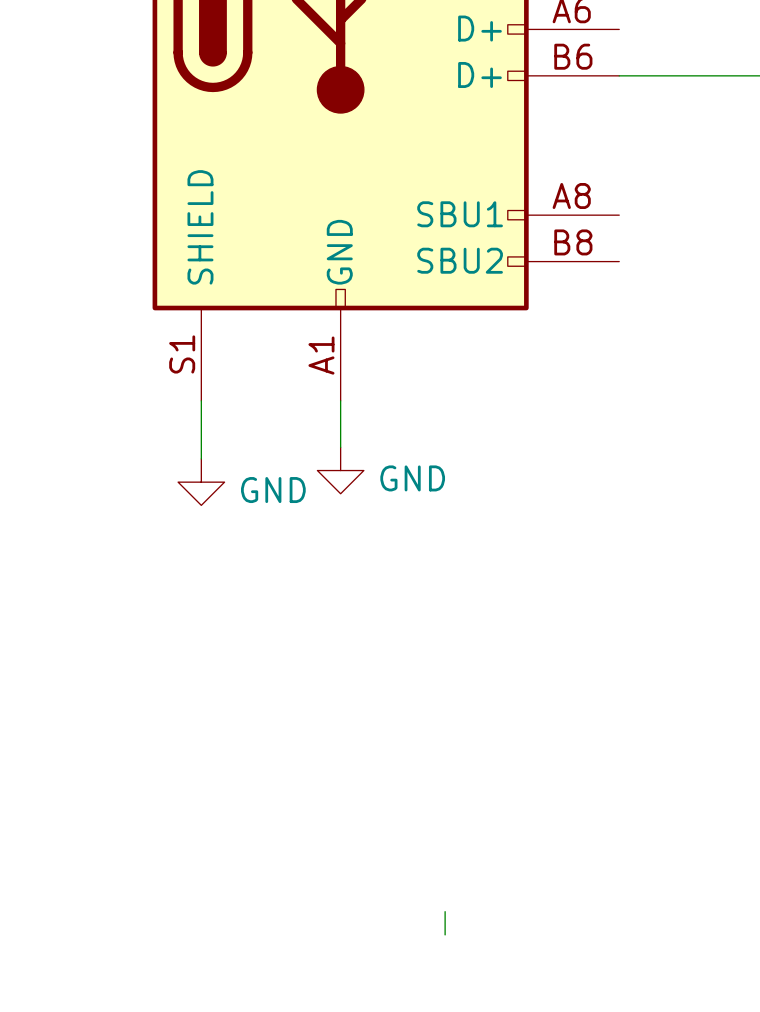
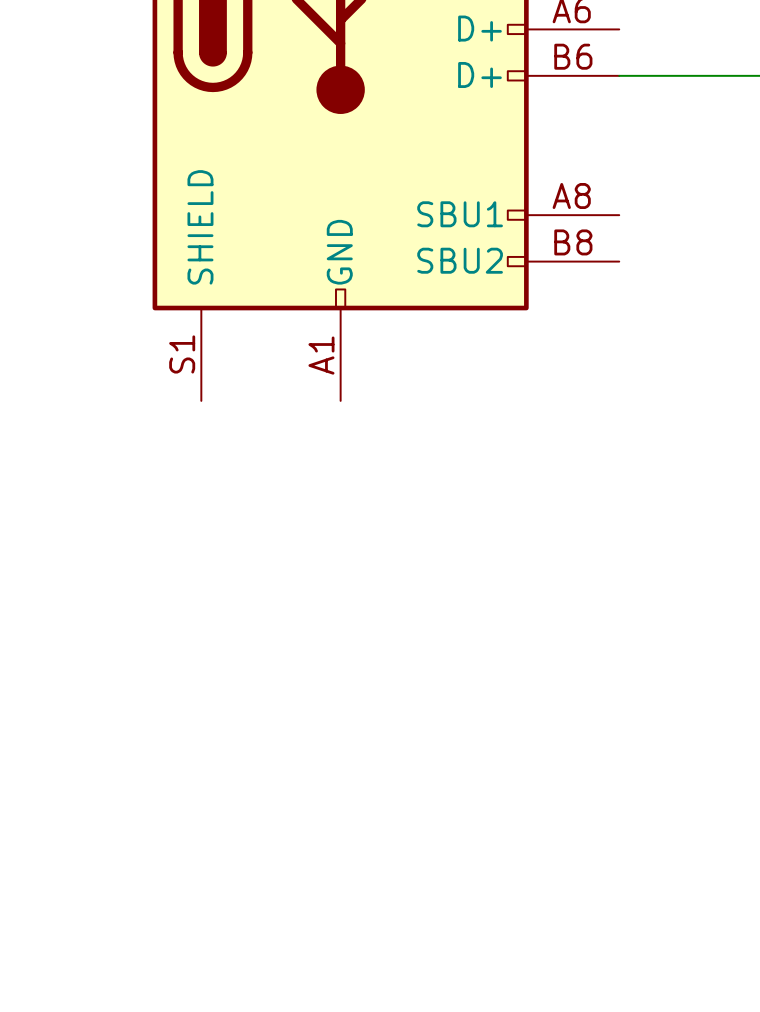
wire: (201, 400) (201, 458) -> none
wire: (340, 400) (340, 447) -> none
power symbol: GND (340, 470) -> none
power symbol: GND (201, 482) -> none
wire: (445, 911) (445, 934) -> none

